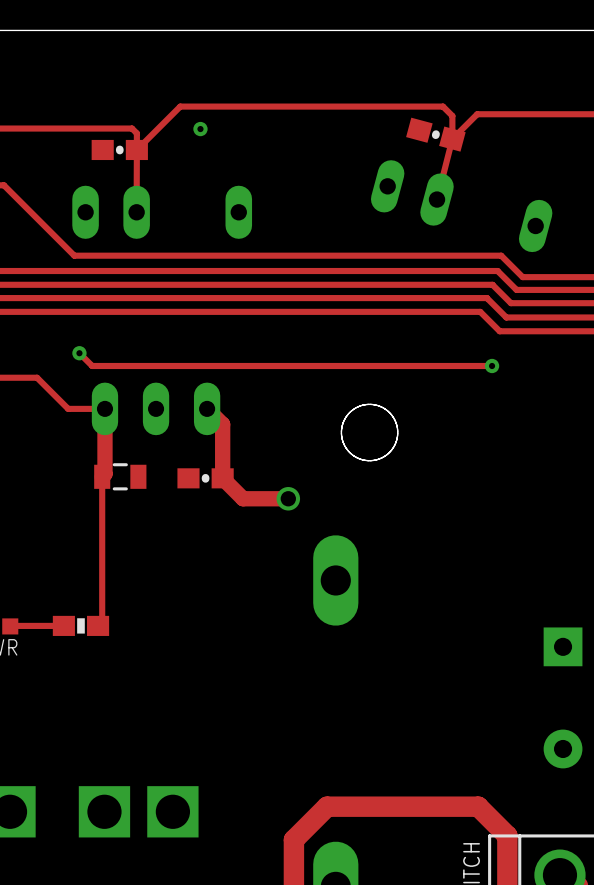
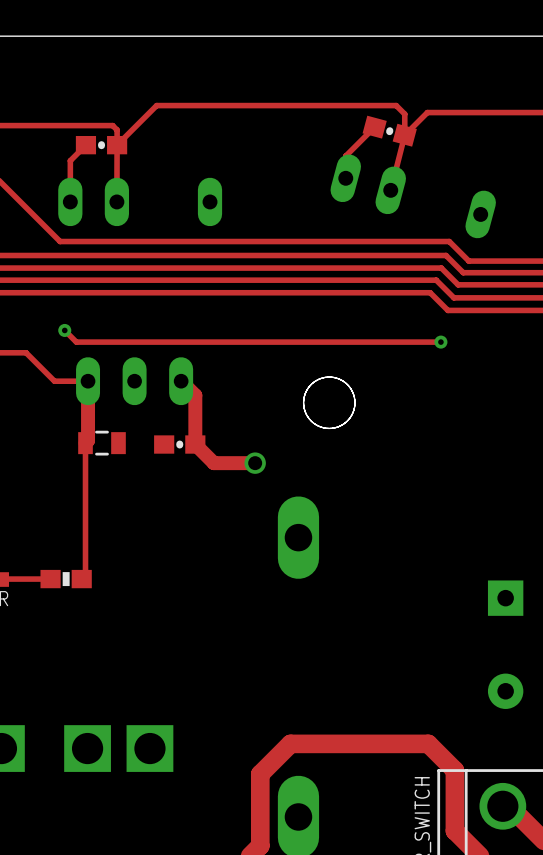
via: (200, 129) -> none
track: none -> (374, 127) (345, 156) (345, 178)
track: none -> (85, 145) (70, 160) (70, 201)

